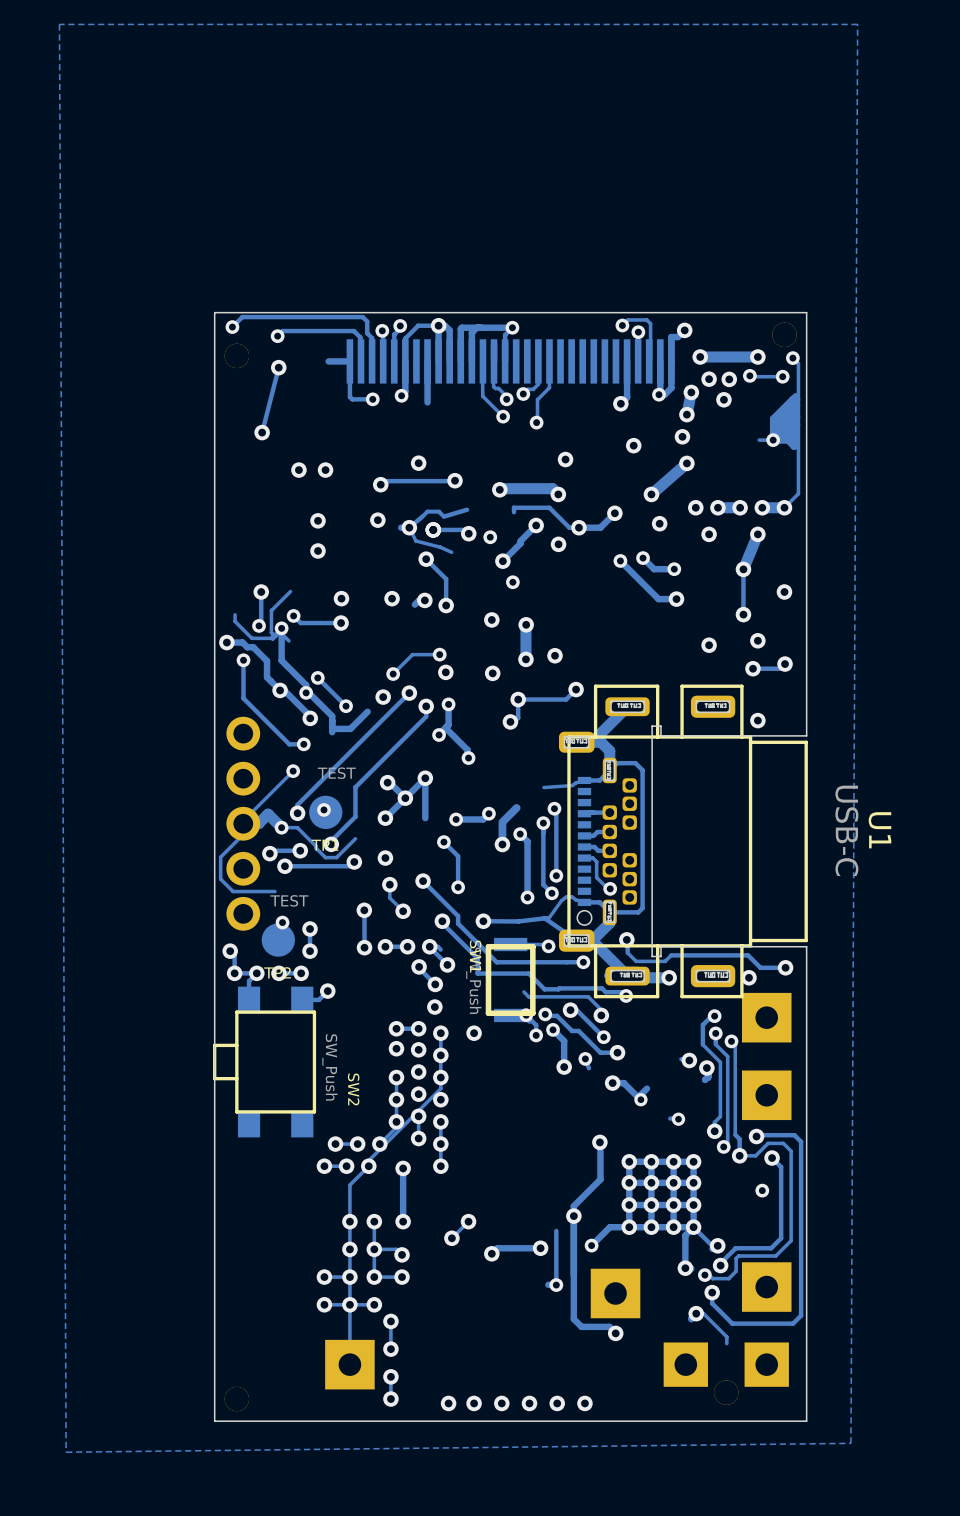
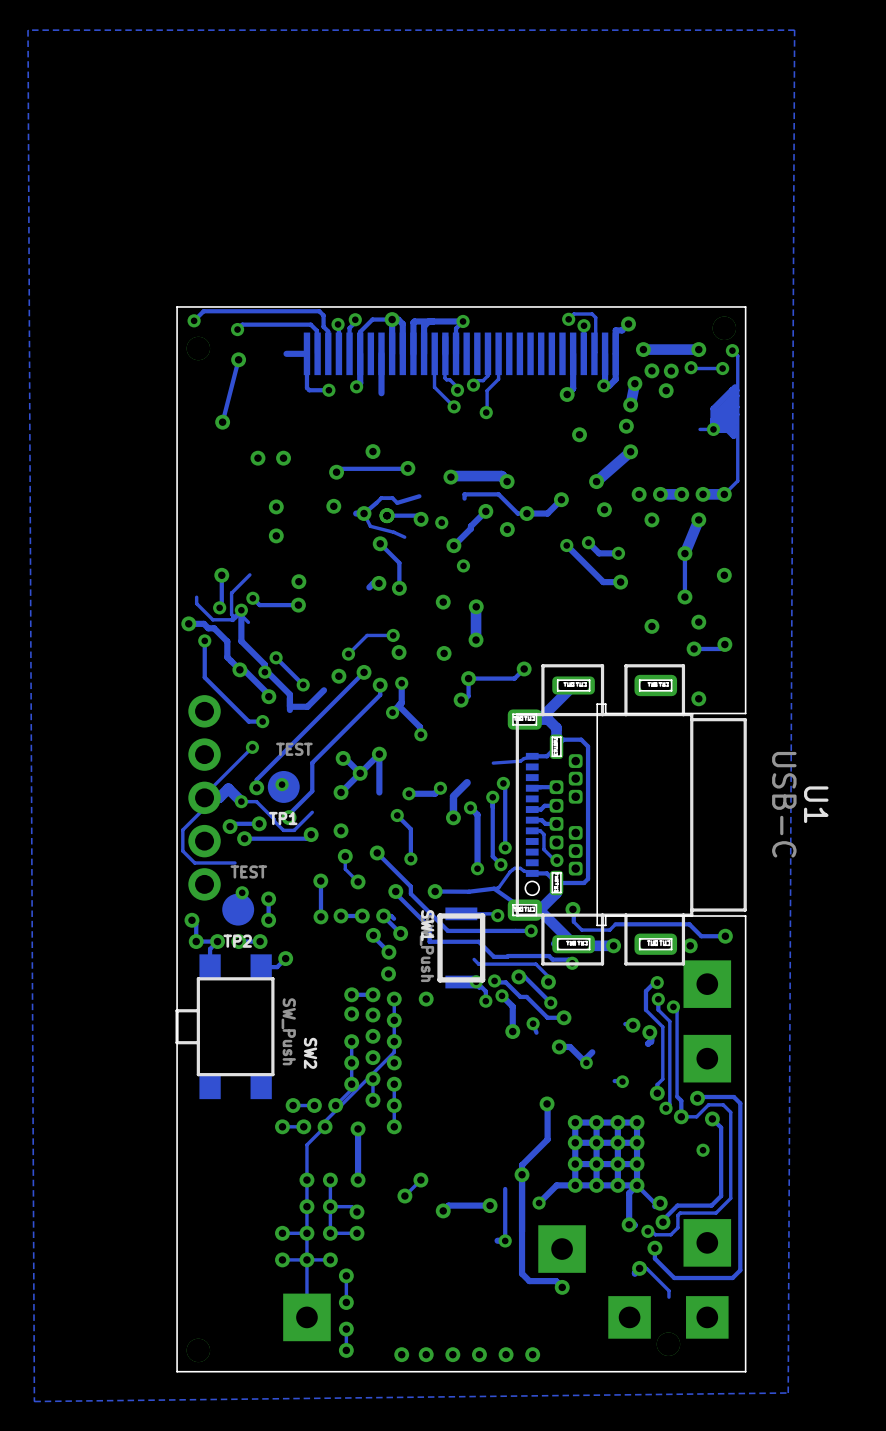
via: (565, 459) -> none
via: (392, 598) -> none
via: (555, 655) -> none

